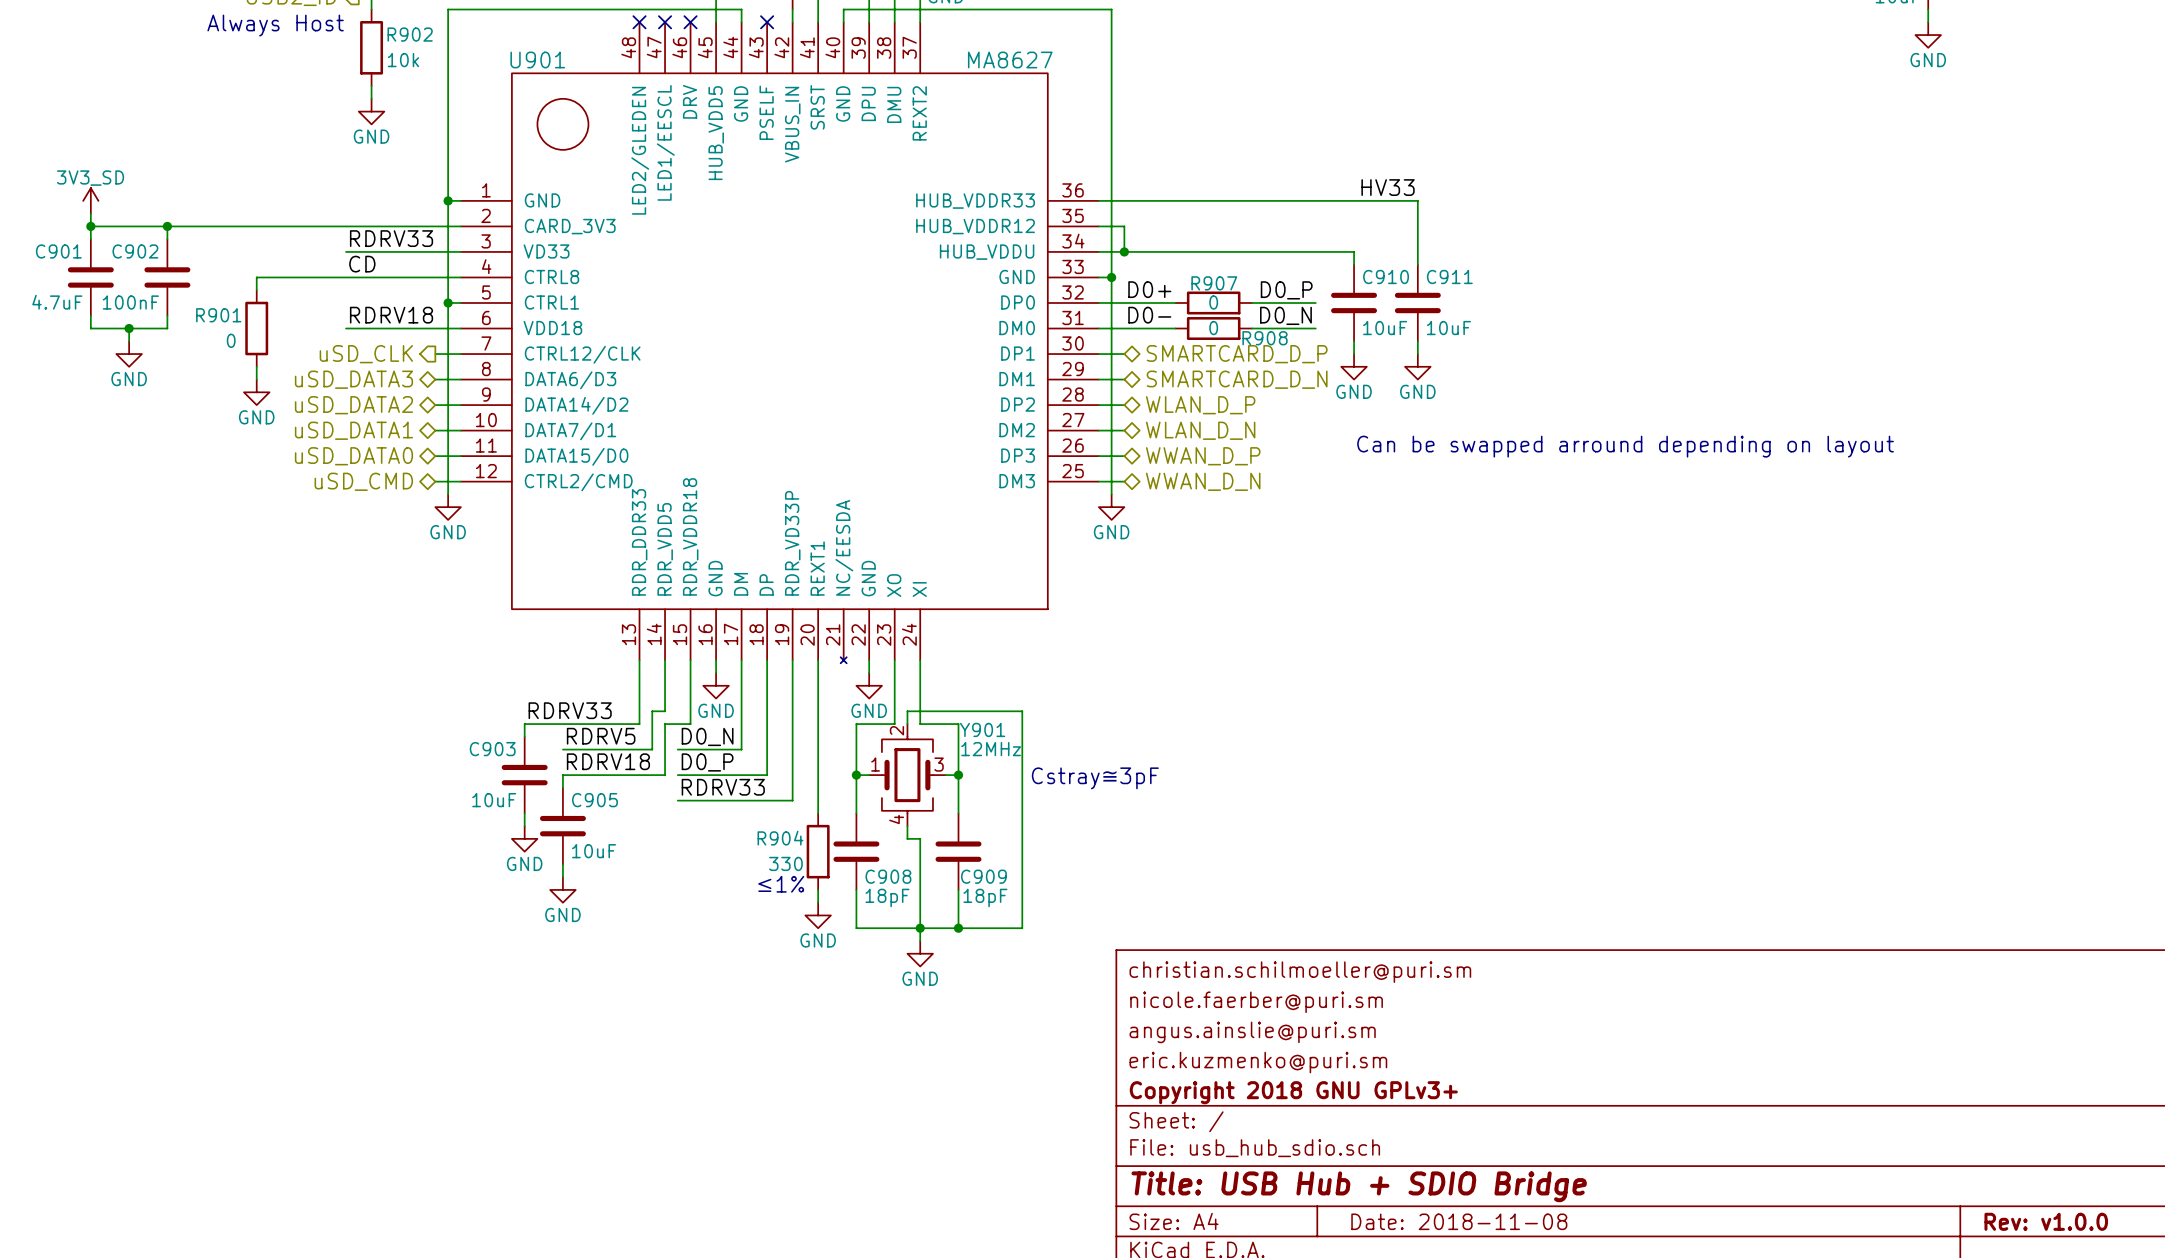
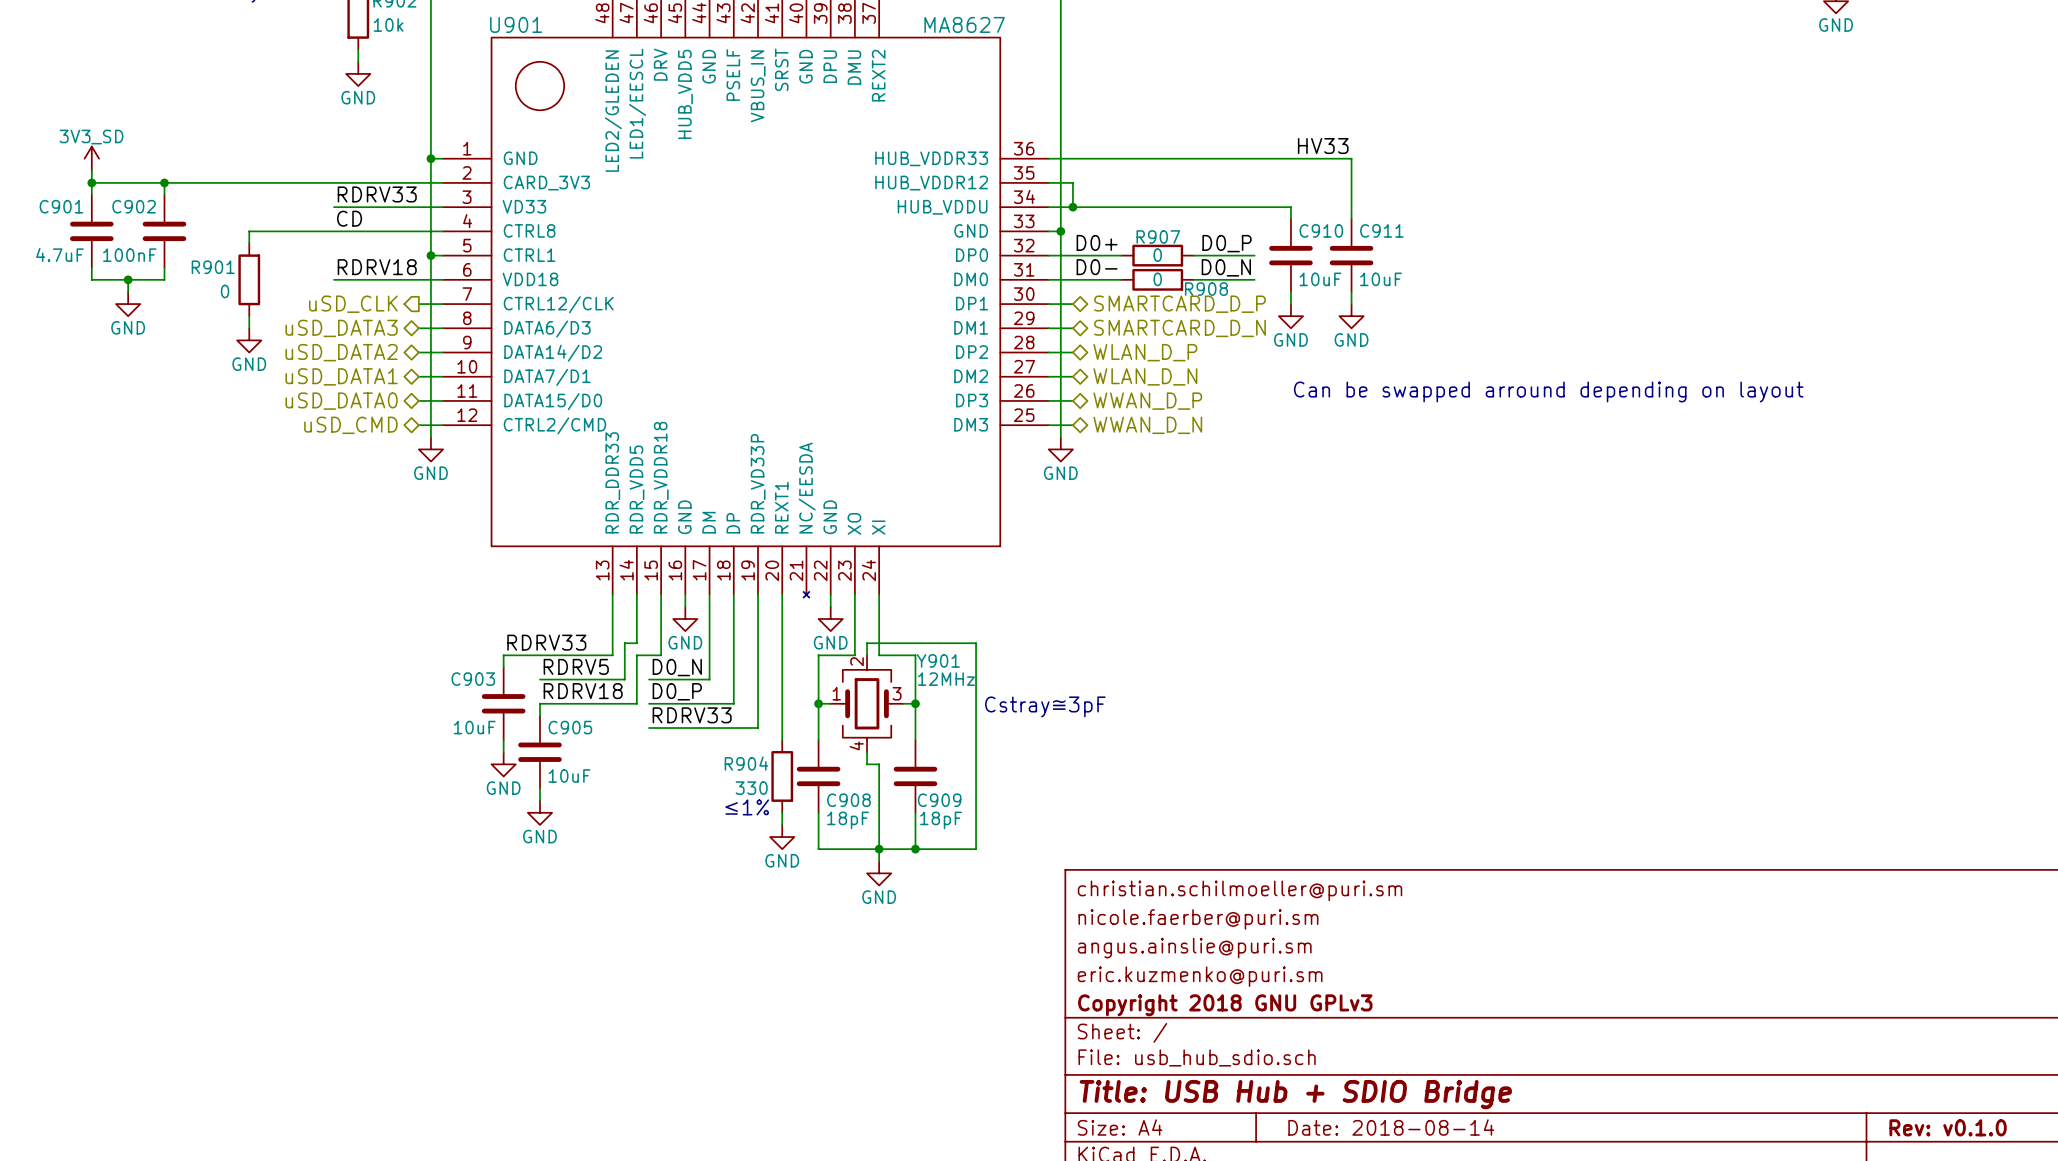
title block: Copyright 2018 GNU GPLv3+ (1293, 1092) -> Copyright 2018 GNU GPLv3 (1225, 1005)
title block: Date: 2018-11-08 (1459, 1221) -> Date: 2018-08-14 (1391, 1127)
title block: Rev: v1.0.0 (2046, 1221) -> Rev: v0.1.0 (1948, 1127)

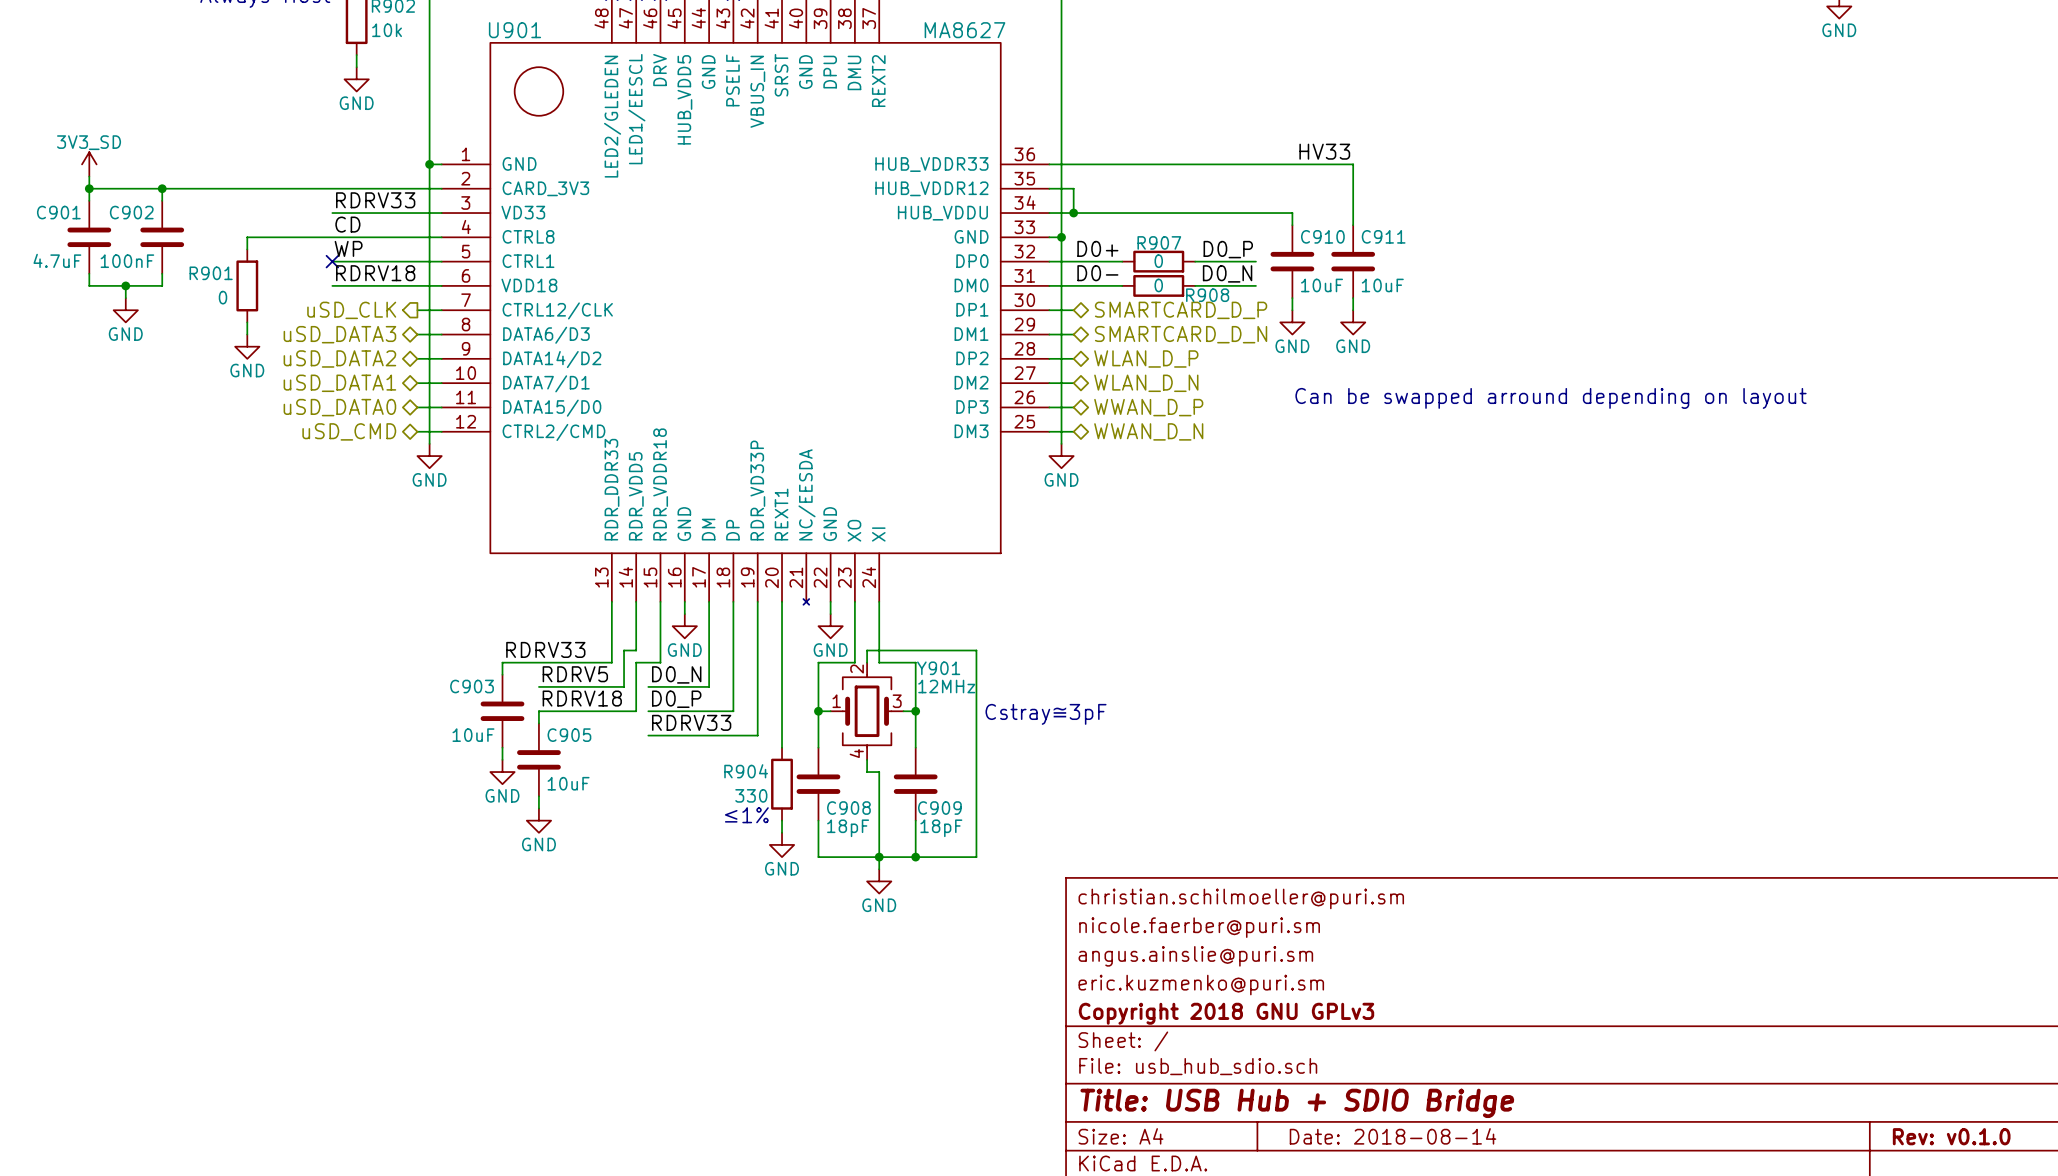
label: none -> WP (348, 248)
wire: none -> (332, 261) (429, 261)
no-connect mark: none -> (332, 261)
junction: (430, 255) -> none

